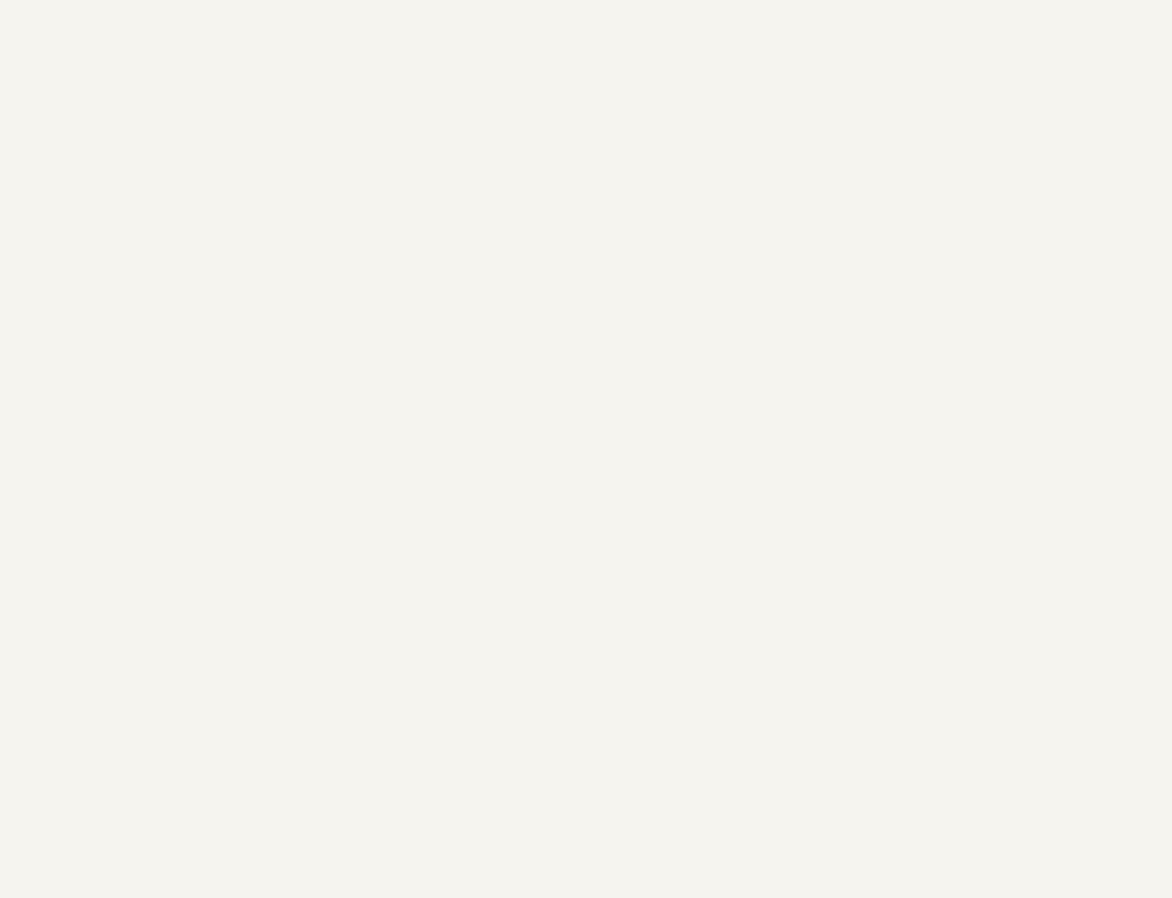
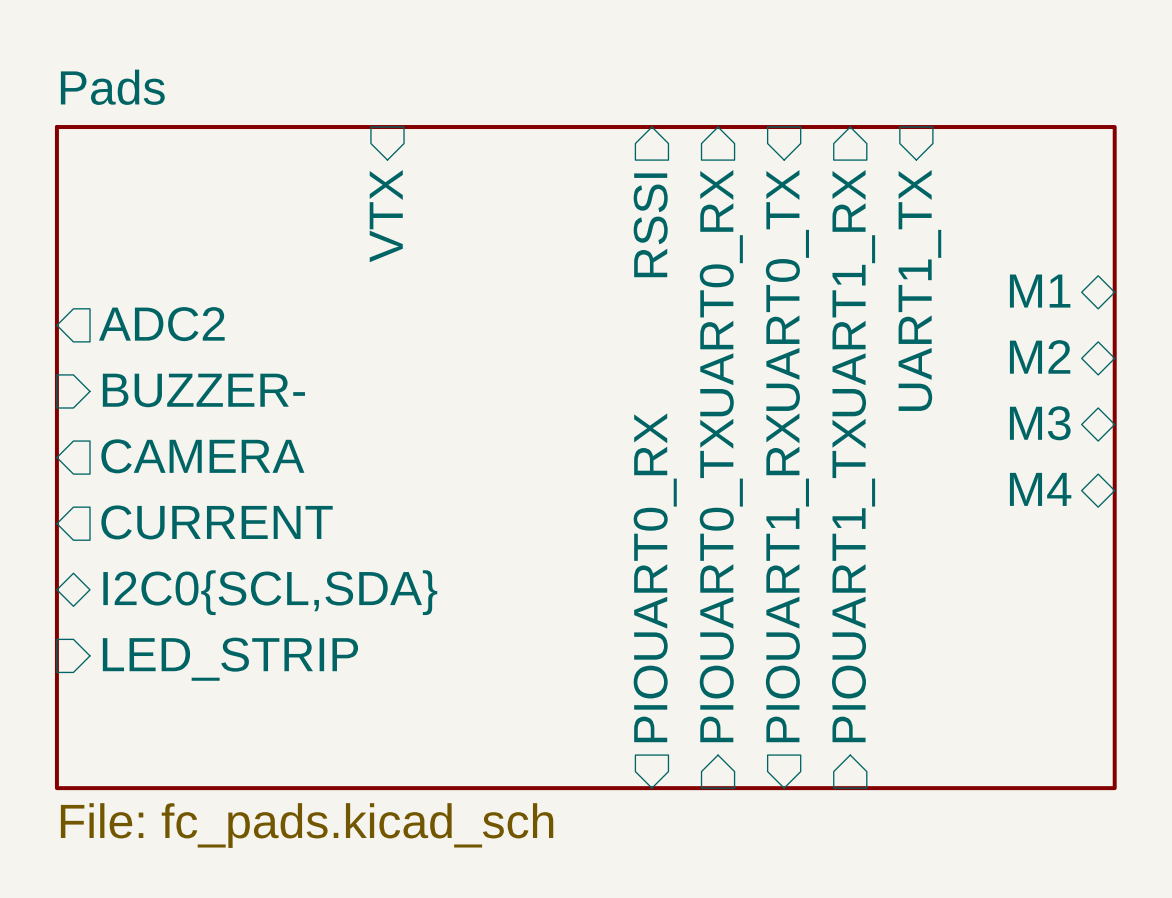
sheet pin: none -> VTX (386, 216)
sheet pin: none -> RSSI (650, 225)
sheet pin: none -> UART0_TX (787, 290)
sheet pin: none -> UART1_TX (919, 290)
sheet pin: none -> M1 (1040, 291)
sheet pin: none -> UART0_RX (721, 293)
sheet pin: none -> UART1_RX (853, 293)
sheet pin: none -> ADC2 (161, 324)
sheet pin: none -> M2 (1040, 356)
sheet pin: none -> BUZZER- (203, 390)
sheet pin: none -> M3 (1040, 423)
sheet pin: none -> CAMERA (202, 456)
sheet Pads: none -> File: fc_pads.kicad_sch (585, 457)
sheet pin: none -> M4 (1040, 489)
sheet pin: none -> CURRENT (217, 522)
sheet pin: none -> PIOUART0_RX (655, 577)
sheet pin: none -> PIOUART1_RX (787, 577)
sheet pin: none -> PIOUART0_TX (721, 580)
sheet pin: none -> PIOUART1_TX (853, 580)
sheet pin: none -> I2C0{SCL,SDA} (270, 592)
sheet pin: none -> LED_STRIP (230, 659)

